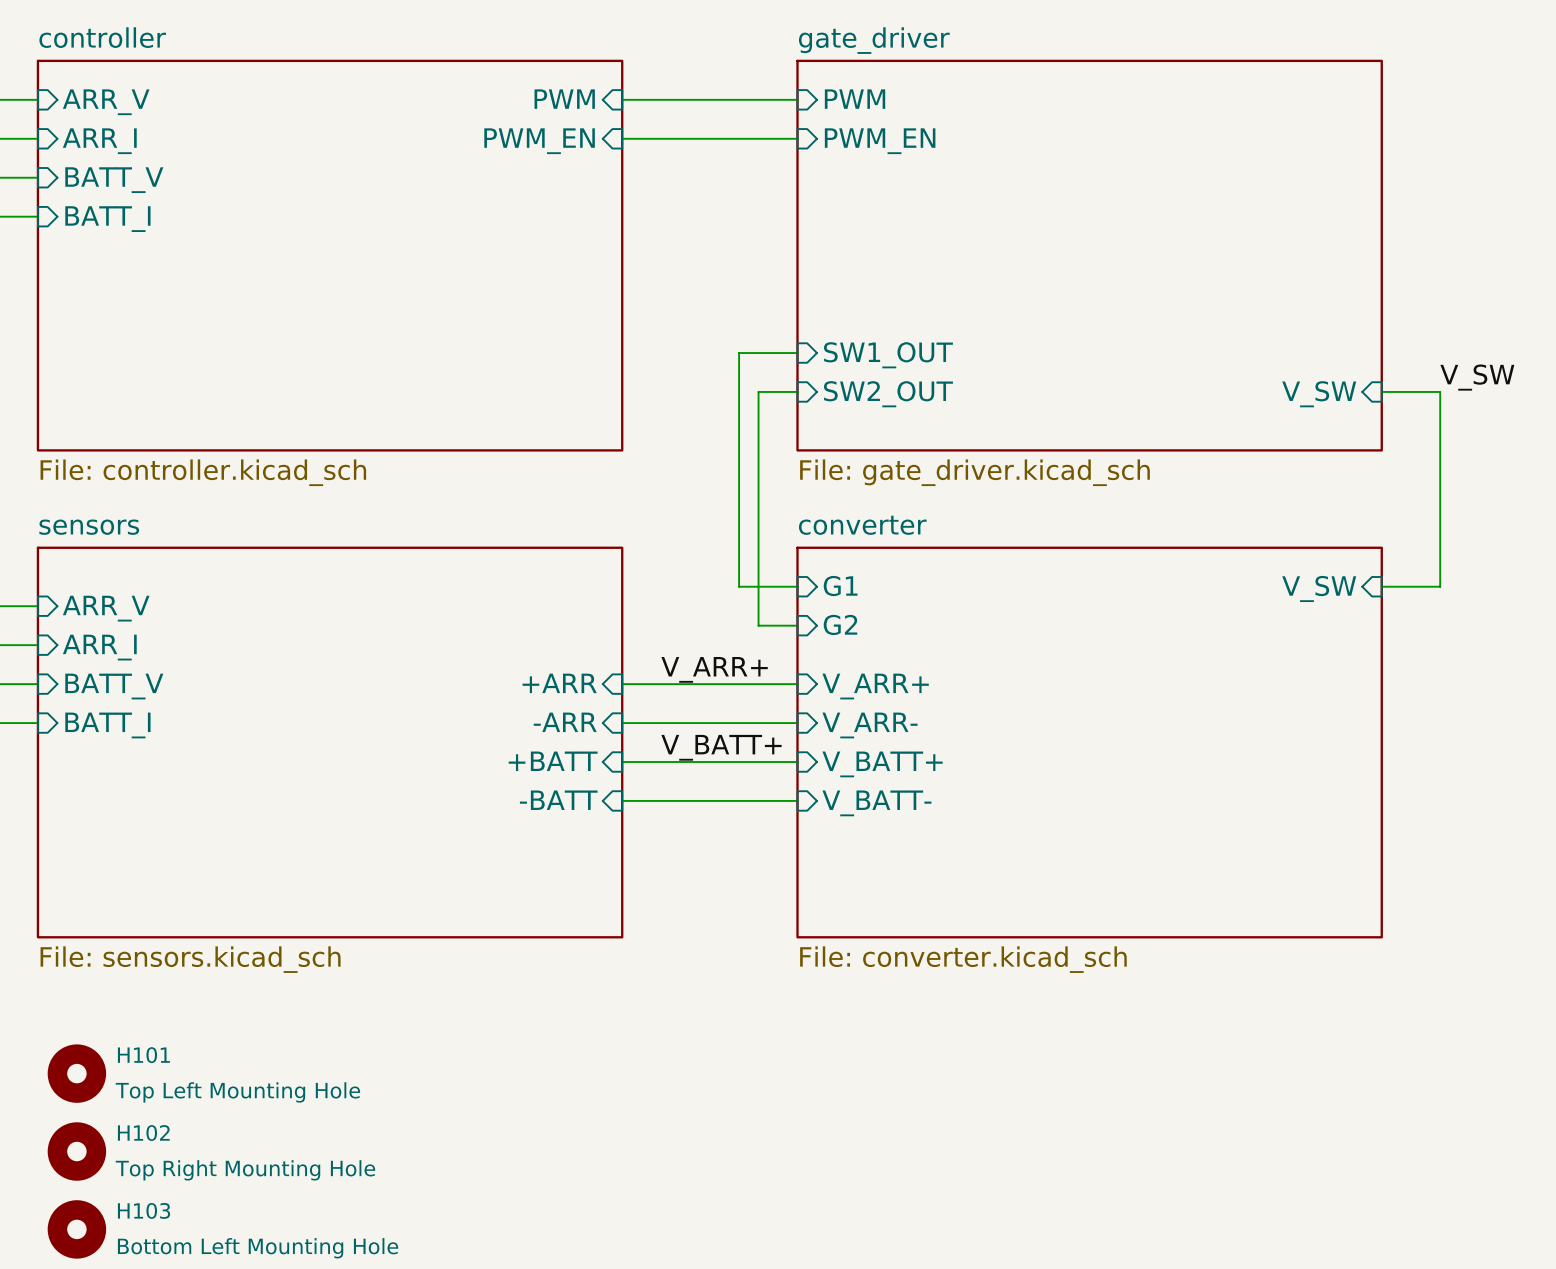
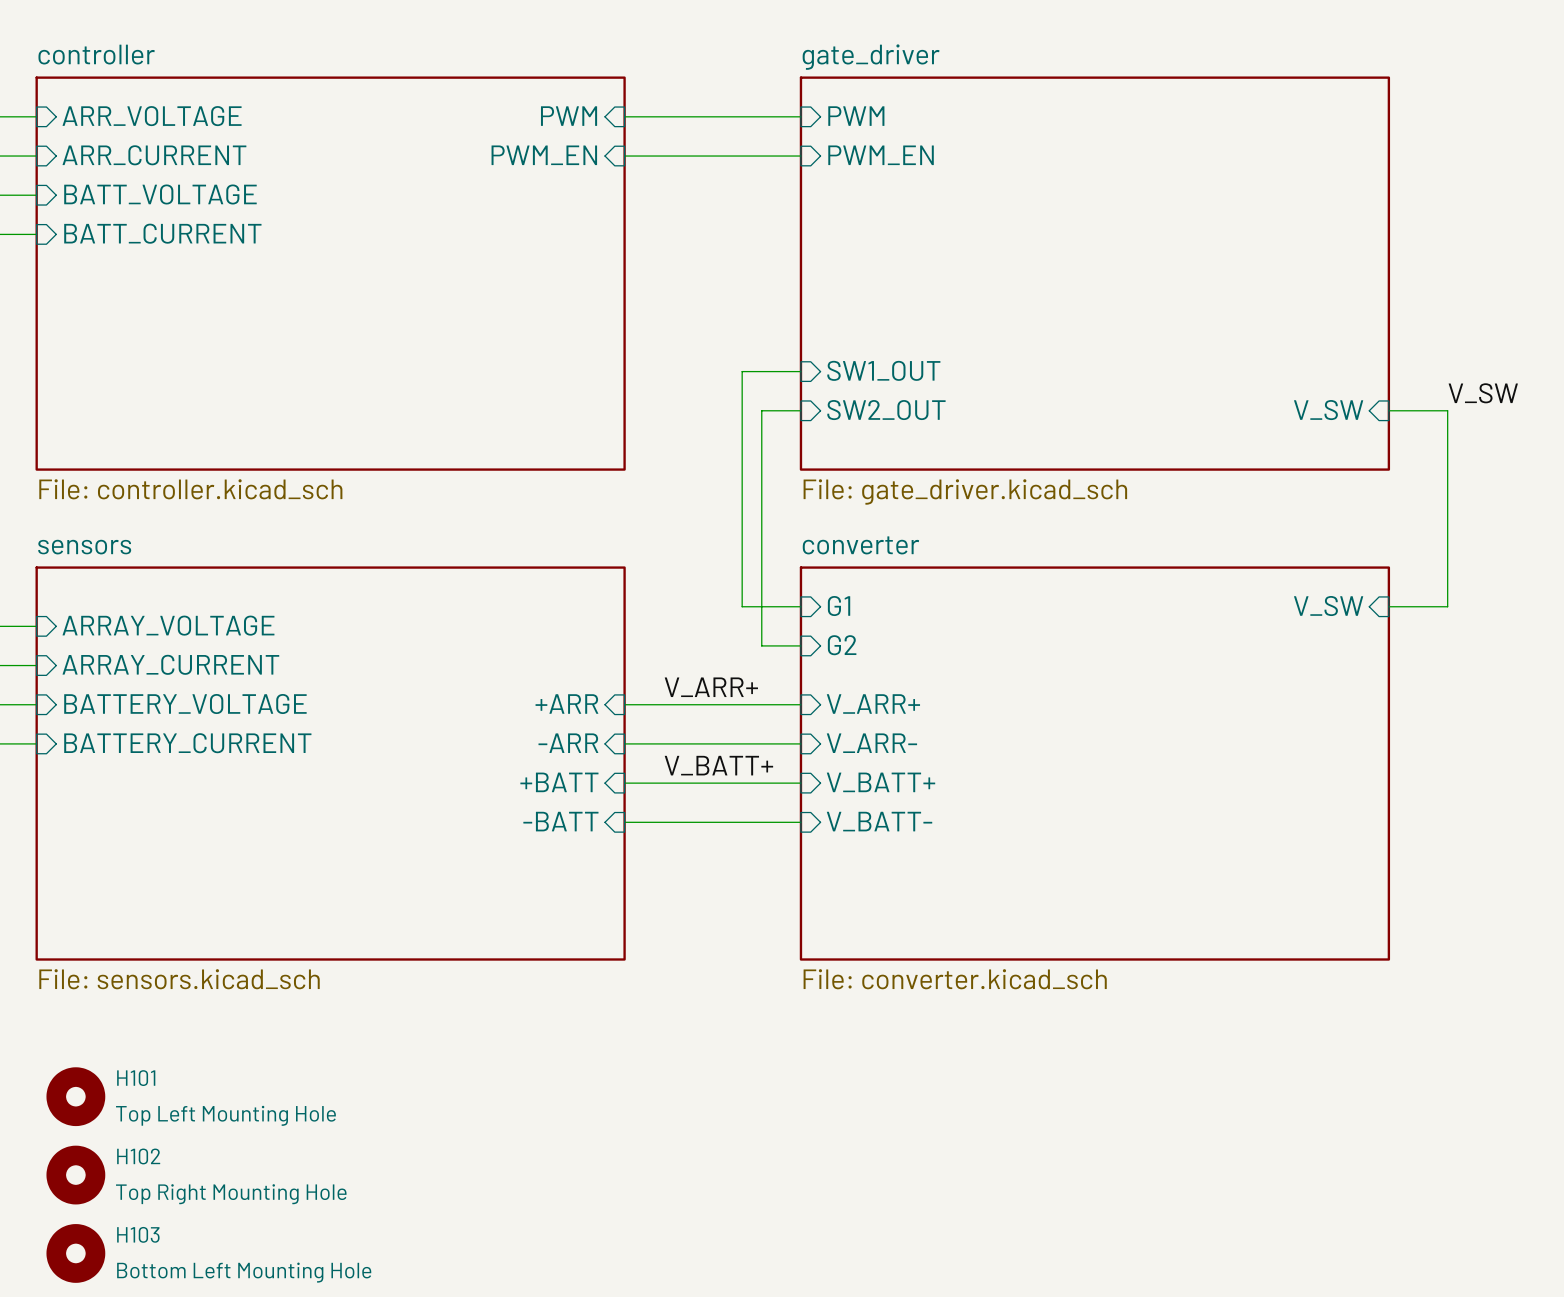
sheet pin: ARR_V (106, 102) -> ARR_VOLTAGE (152, 116)
sheet pin: ARR_I (99, 141) -> ARR_CURRENT (154, 155)
sheet pin: BATT_V (114, 180) -> BATT_VOLTAGE (160, 194)
sheet pin: BATT_I (107, 219) -> BATT_CURRENT (162, 233)
sheet pin: ARR_V (106, 608) -> ARRAY_VOLTAGE (168, 625)
sheet pin: ARR_I (99, 647) -> ARRAY_CURRENT (170, 664)
sheet pin: BATT_V (114, 686) -> BATTERY_VOLTAGE (185, 704)
sheet pin: BATT_I (107, 725) -> BATTERY_CURRENT (187, 743)

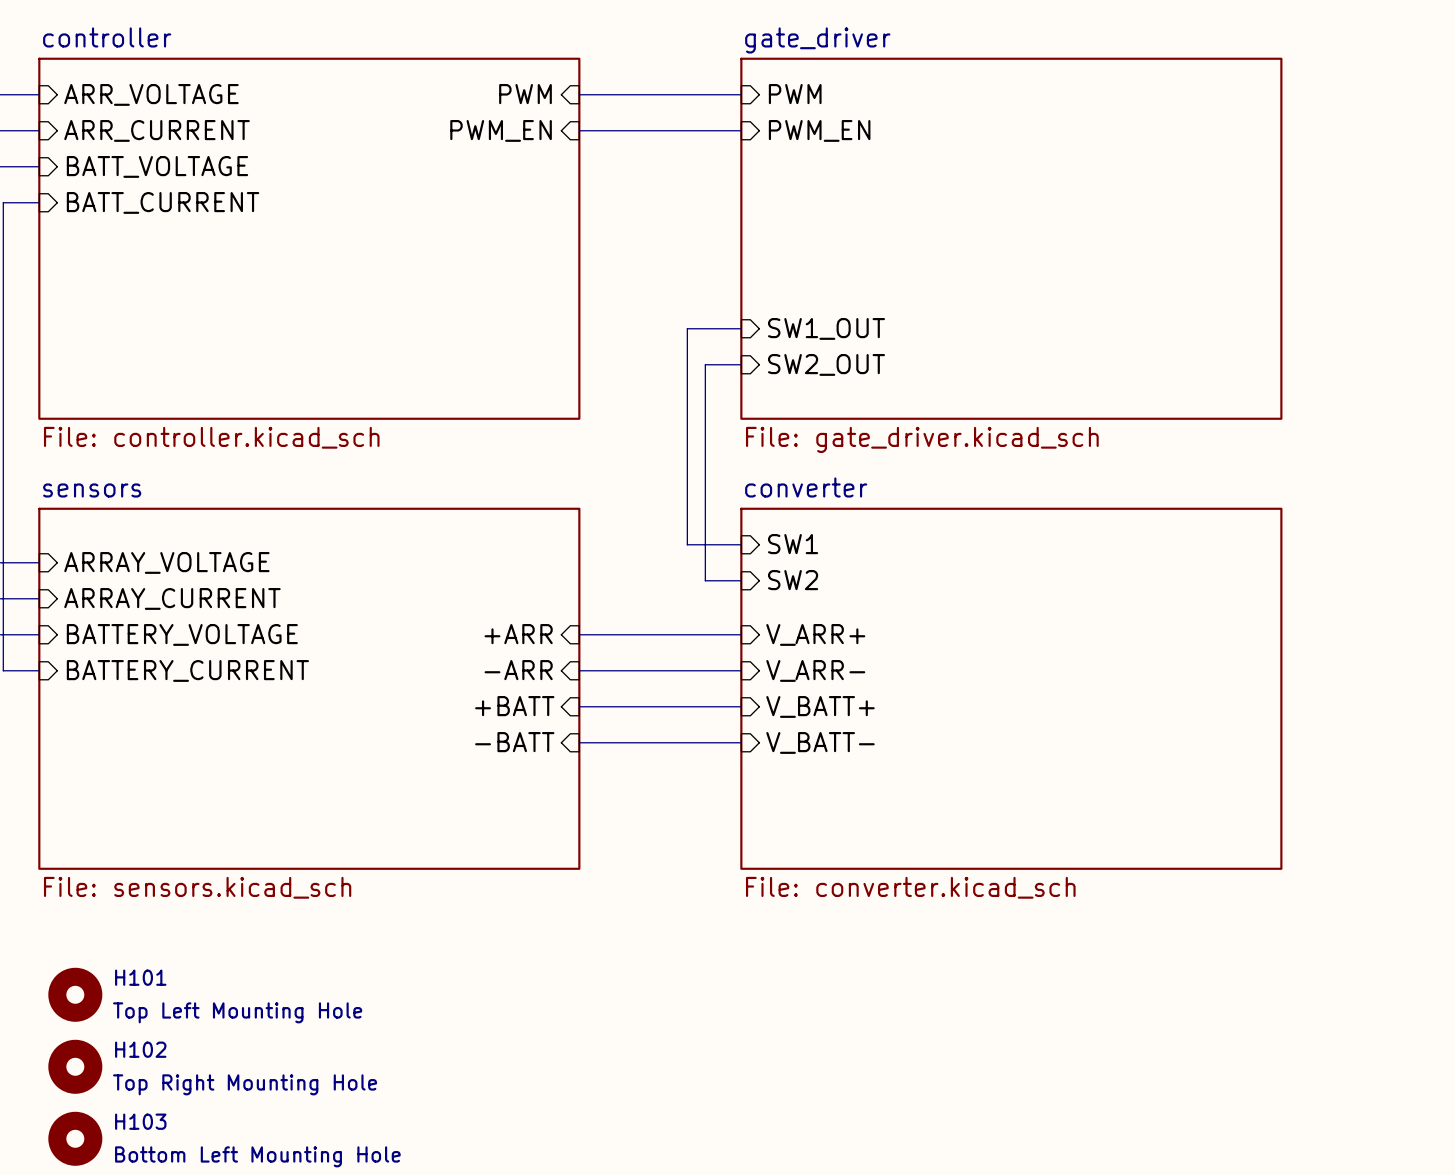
label: V_SW (1483, 393) -> none
sheet pin: V_SW (1328, 410) -> none
wire: (1388, 410) (1447, 410) (1447, 606) (1388, 606) -> none
sheet pin: G1 (839, 606) -> SW1 (793, 544)
sheet pin: V_SW (1328, 606) -> none
sheet pin: G2 (842, 645) -> SW2 (793, 580)
label: V_ARR+ (711, 687) -> none
label: V_BATT+ (718, 765) -> none

